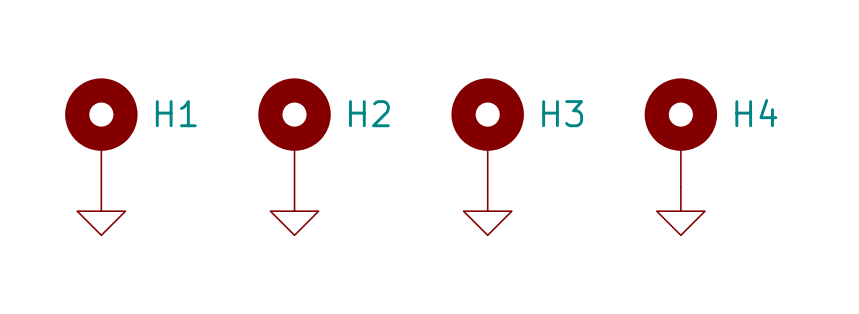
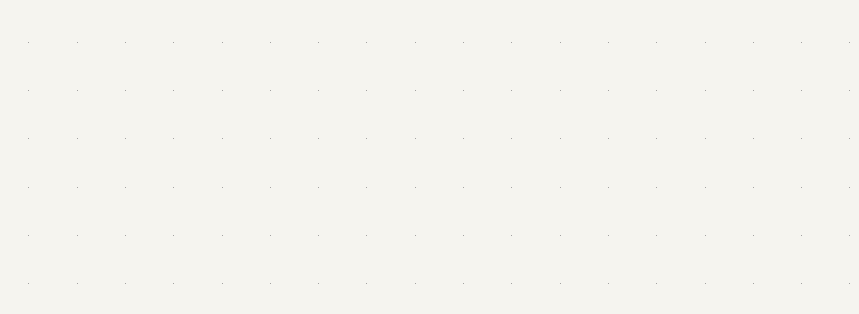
H1: (101, 132) -> none
H2: (294, 132) -> none
H3: (487, 132) -> none
H4: (680, 132) -> none
power symbol: (101, 211) -> none
power symbol: (294, 211) -> none
power symbol: (487, 211) -> none
power symbol: (680, 211) -> none

